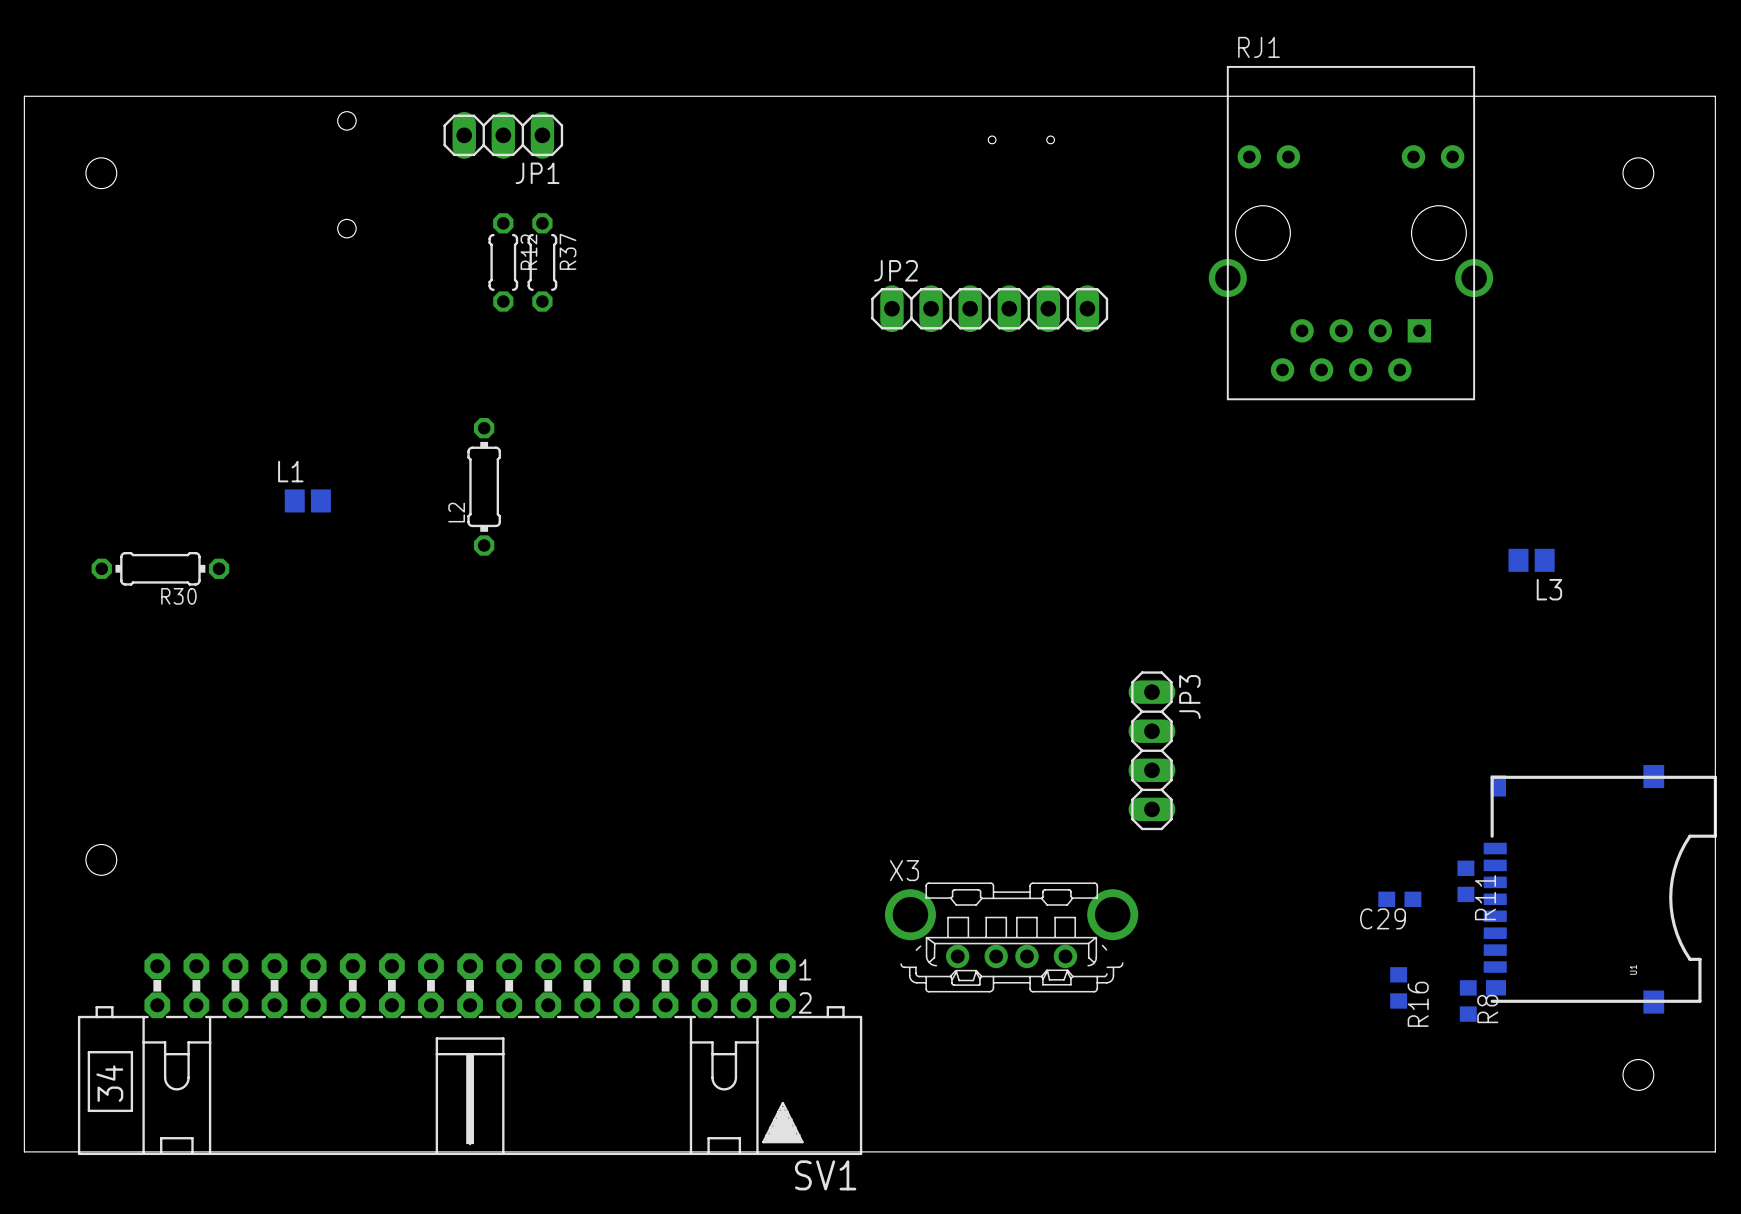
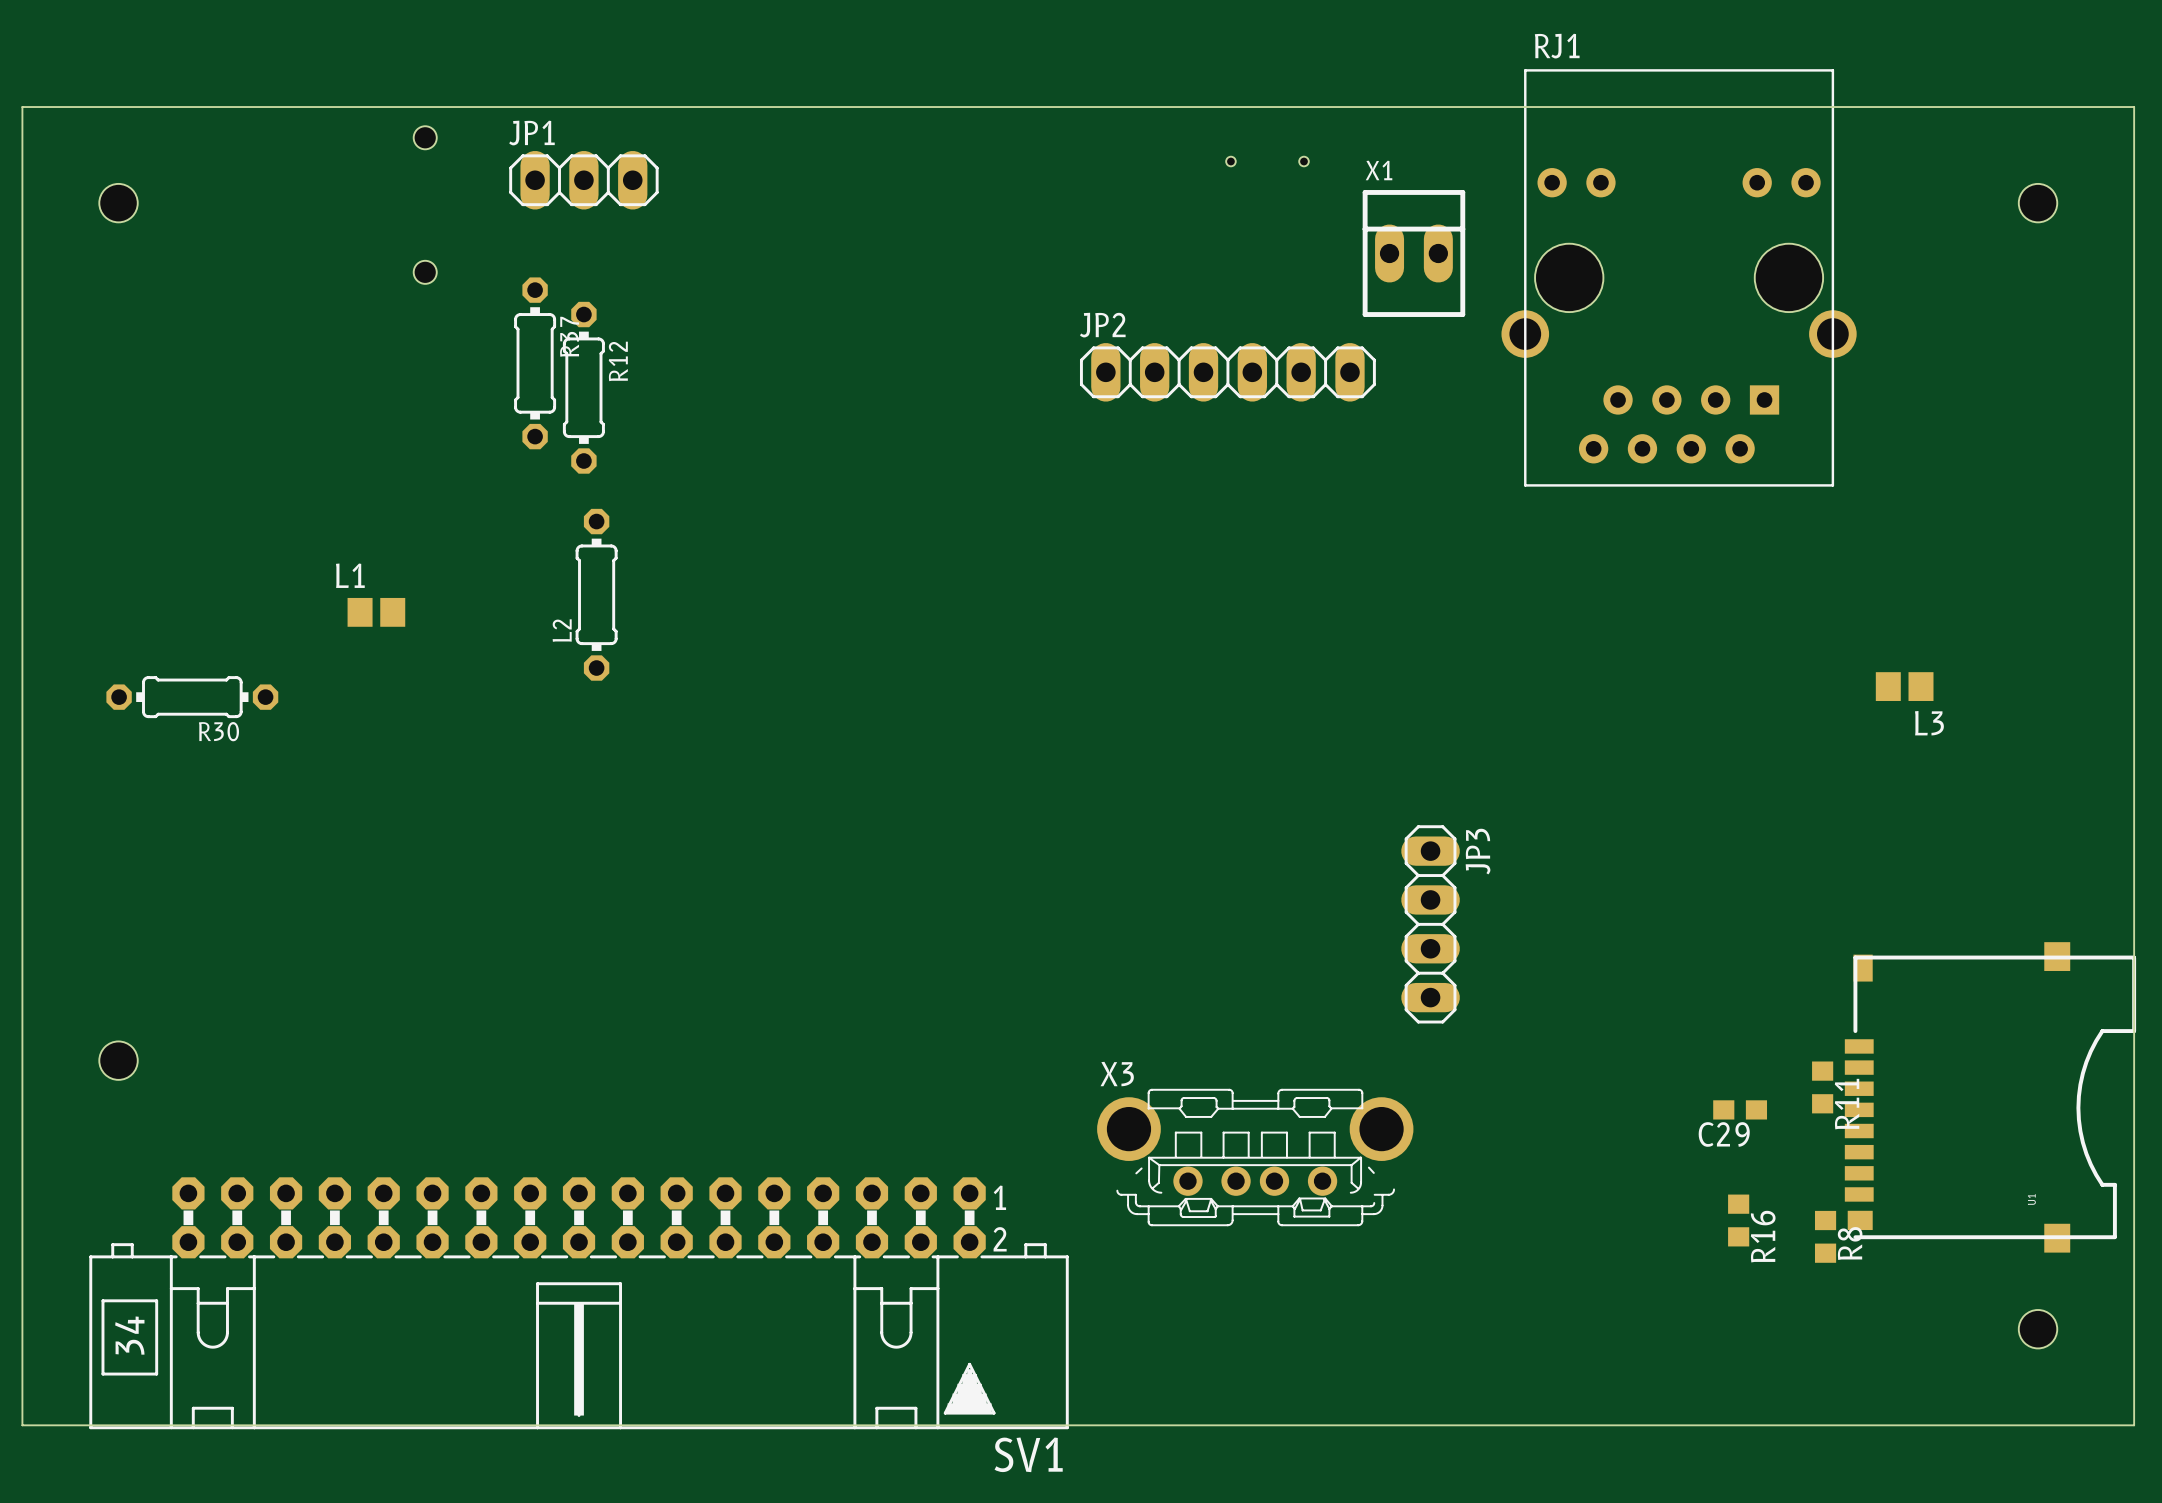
JP1 position: (503, 135) -> (583, 180)
JP1 name position: JP1 (537, 173) -> JP1 (531, 133)
R12 footprint: [488, 213, 519, 312] -> [562, 301, 605, 474]
R37 footprint: [527, 213, 558, 312] -> [514, 277, 557, 450]
X1: none -> (1413, 253)

